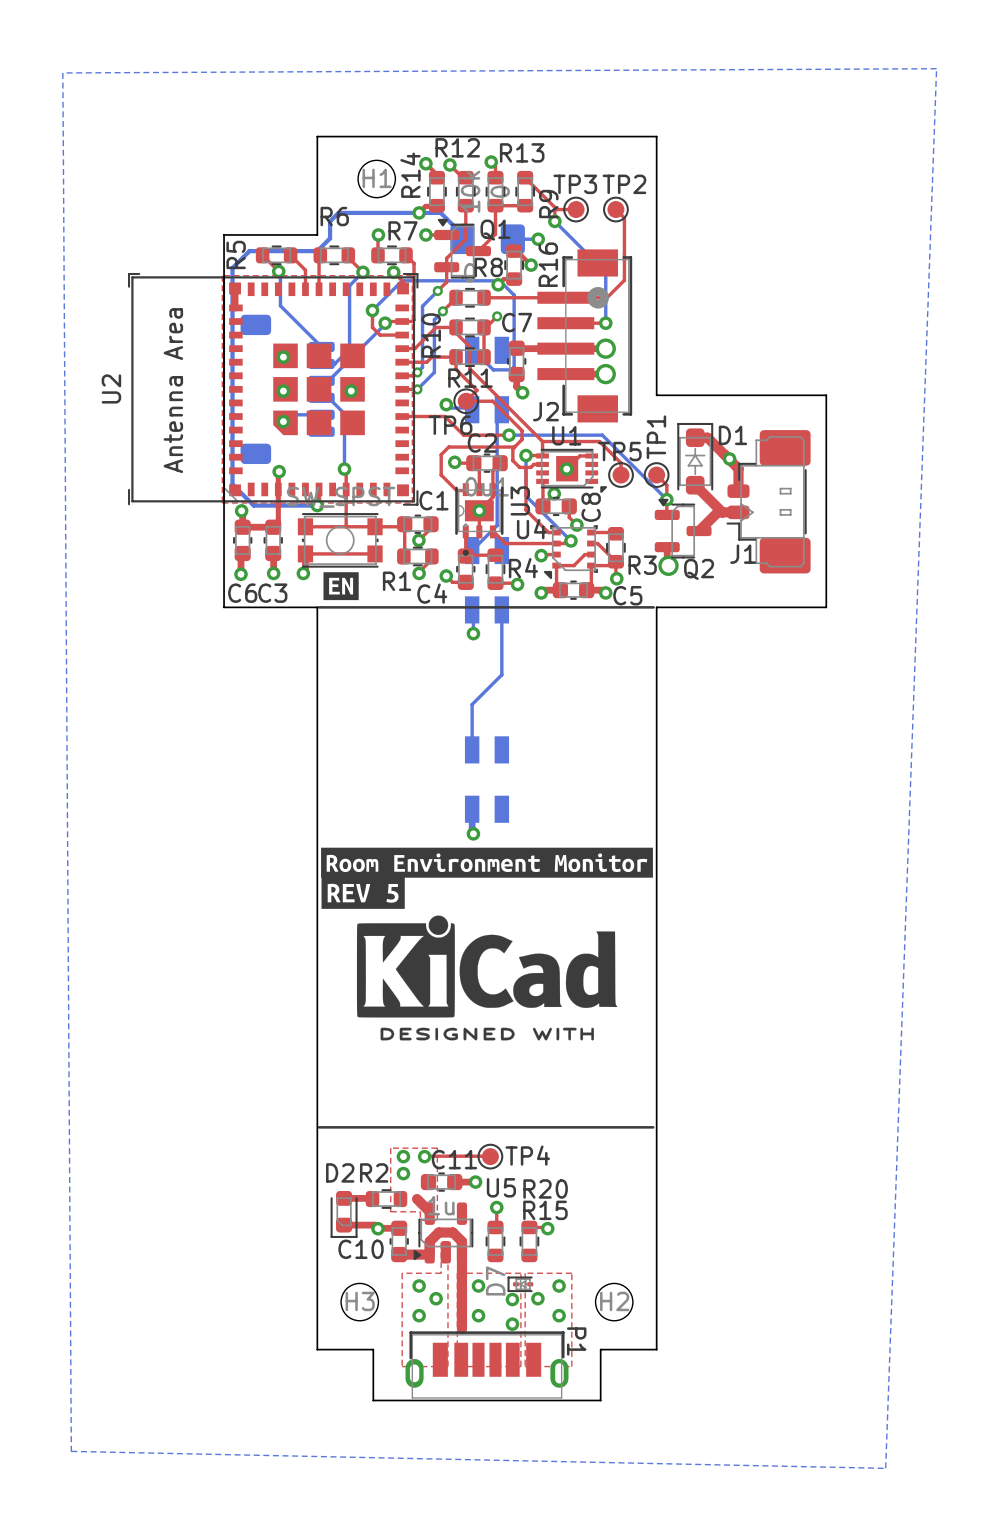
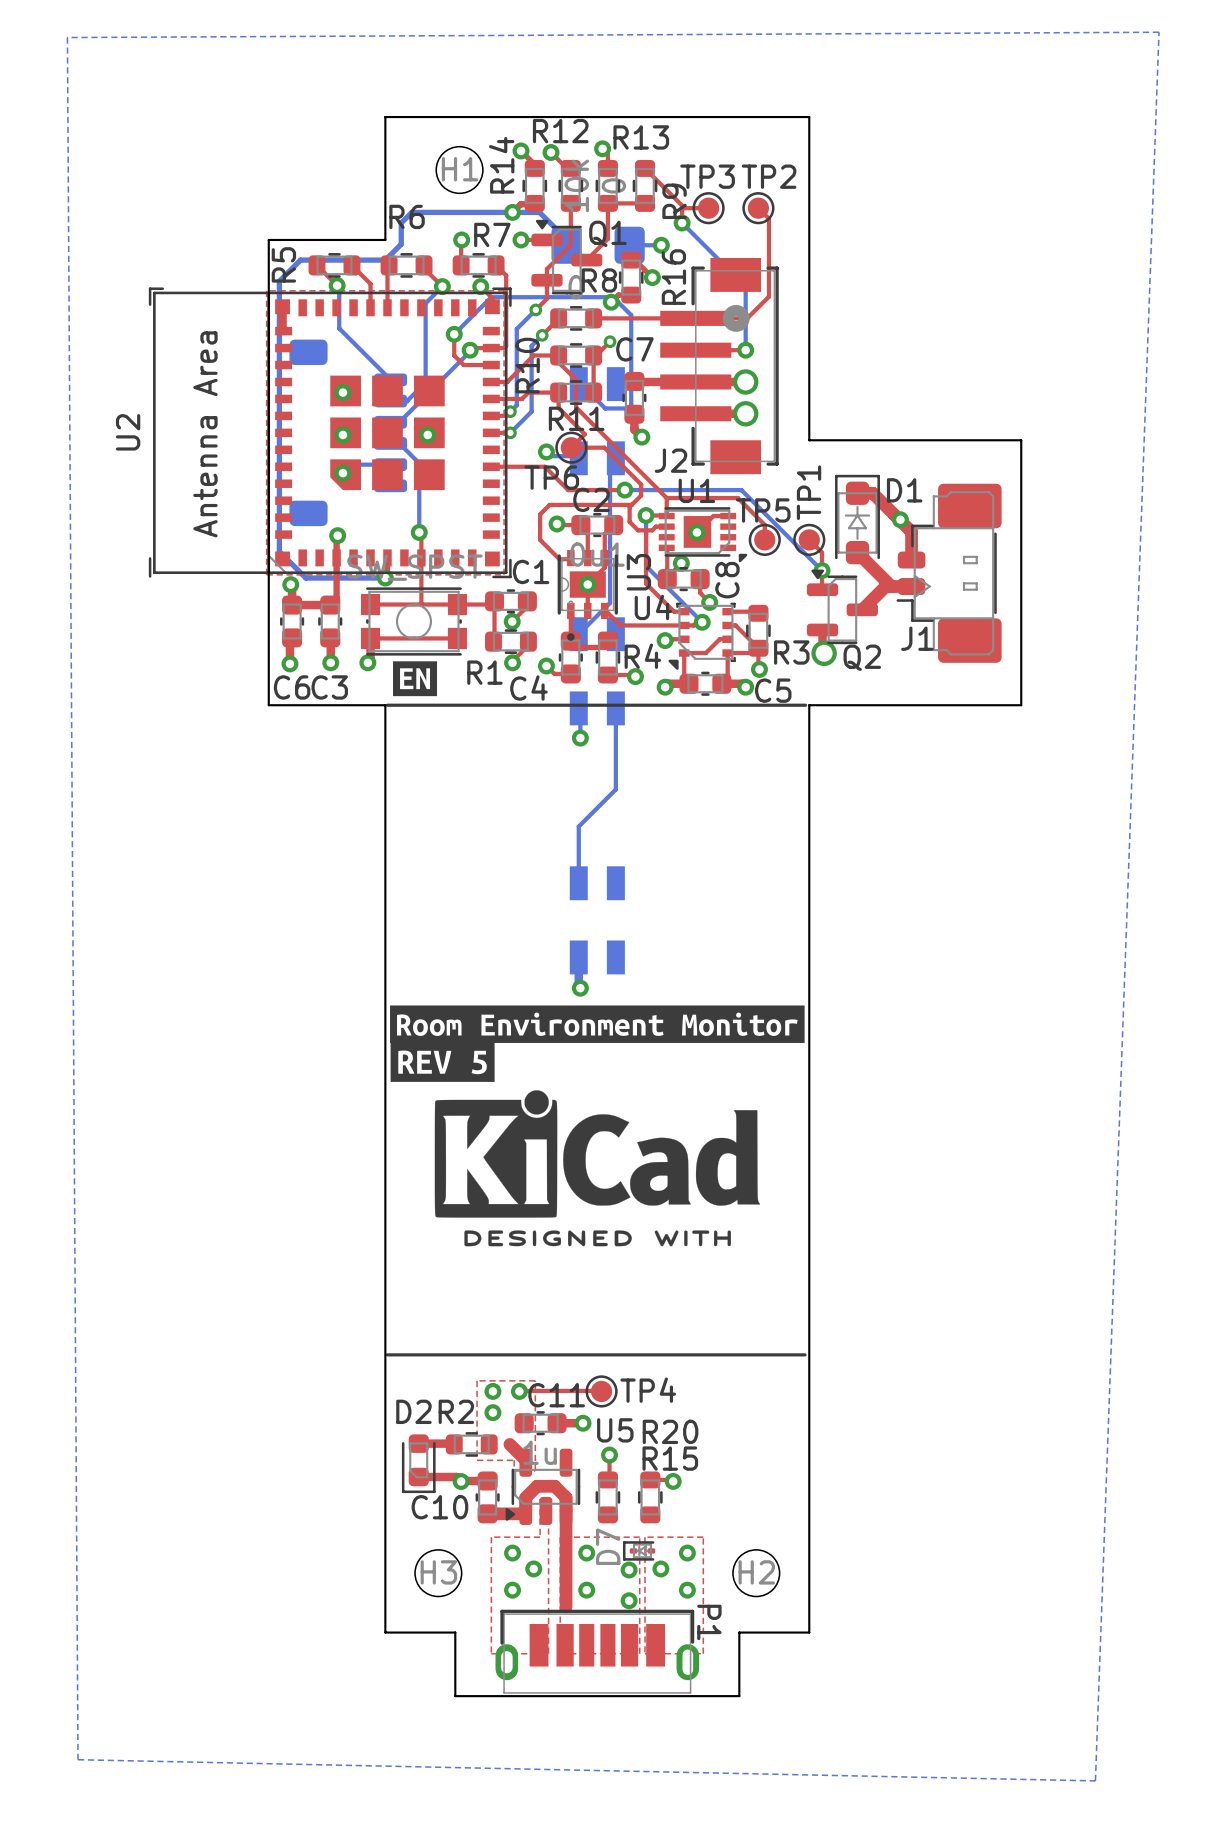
top track: none -> (570, 638) (570, 647) (607, 646)
top track: (466, 555) (495, 555) -> none

